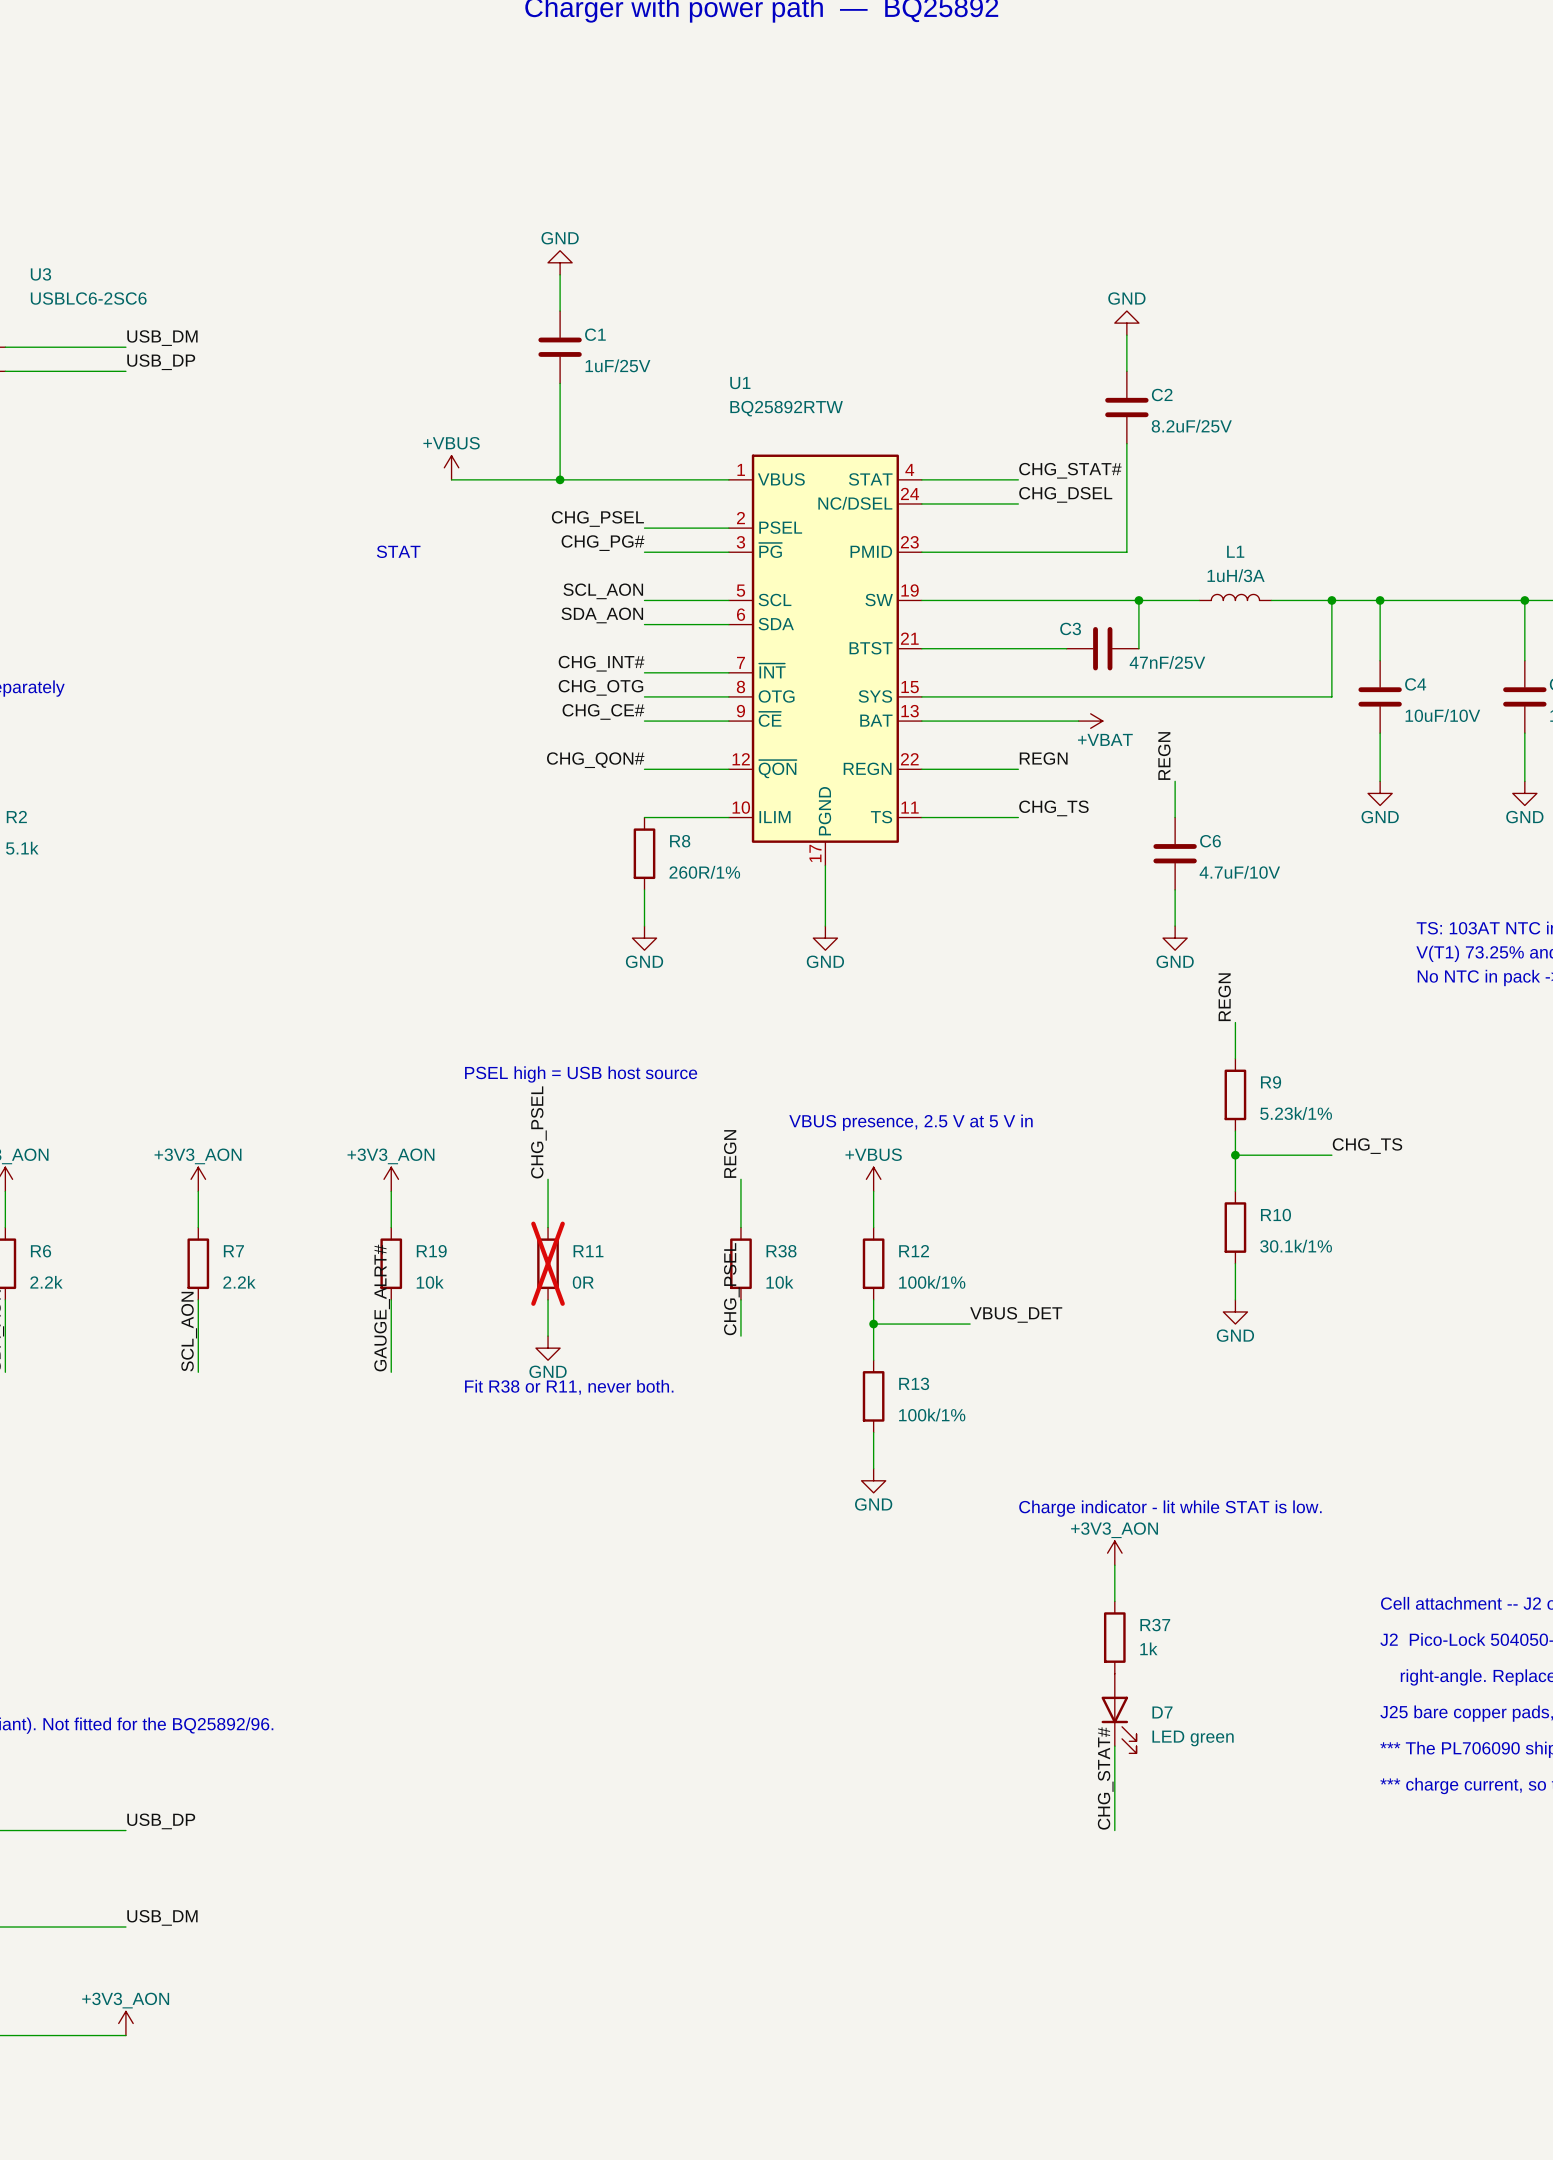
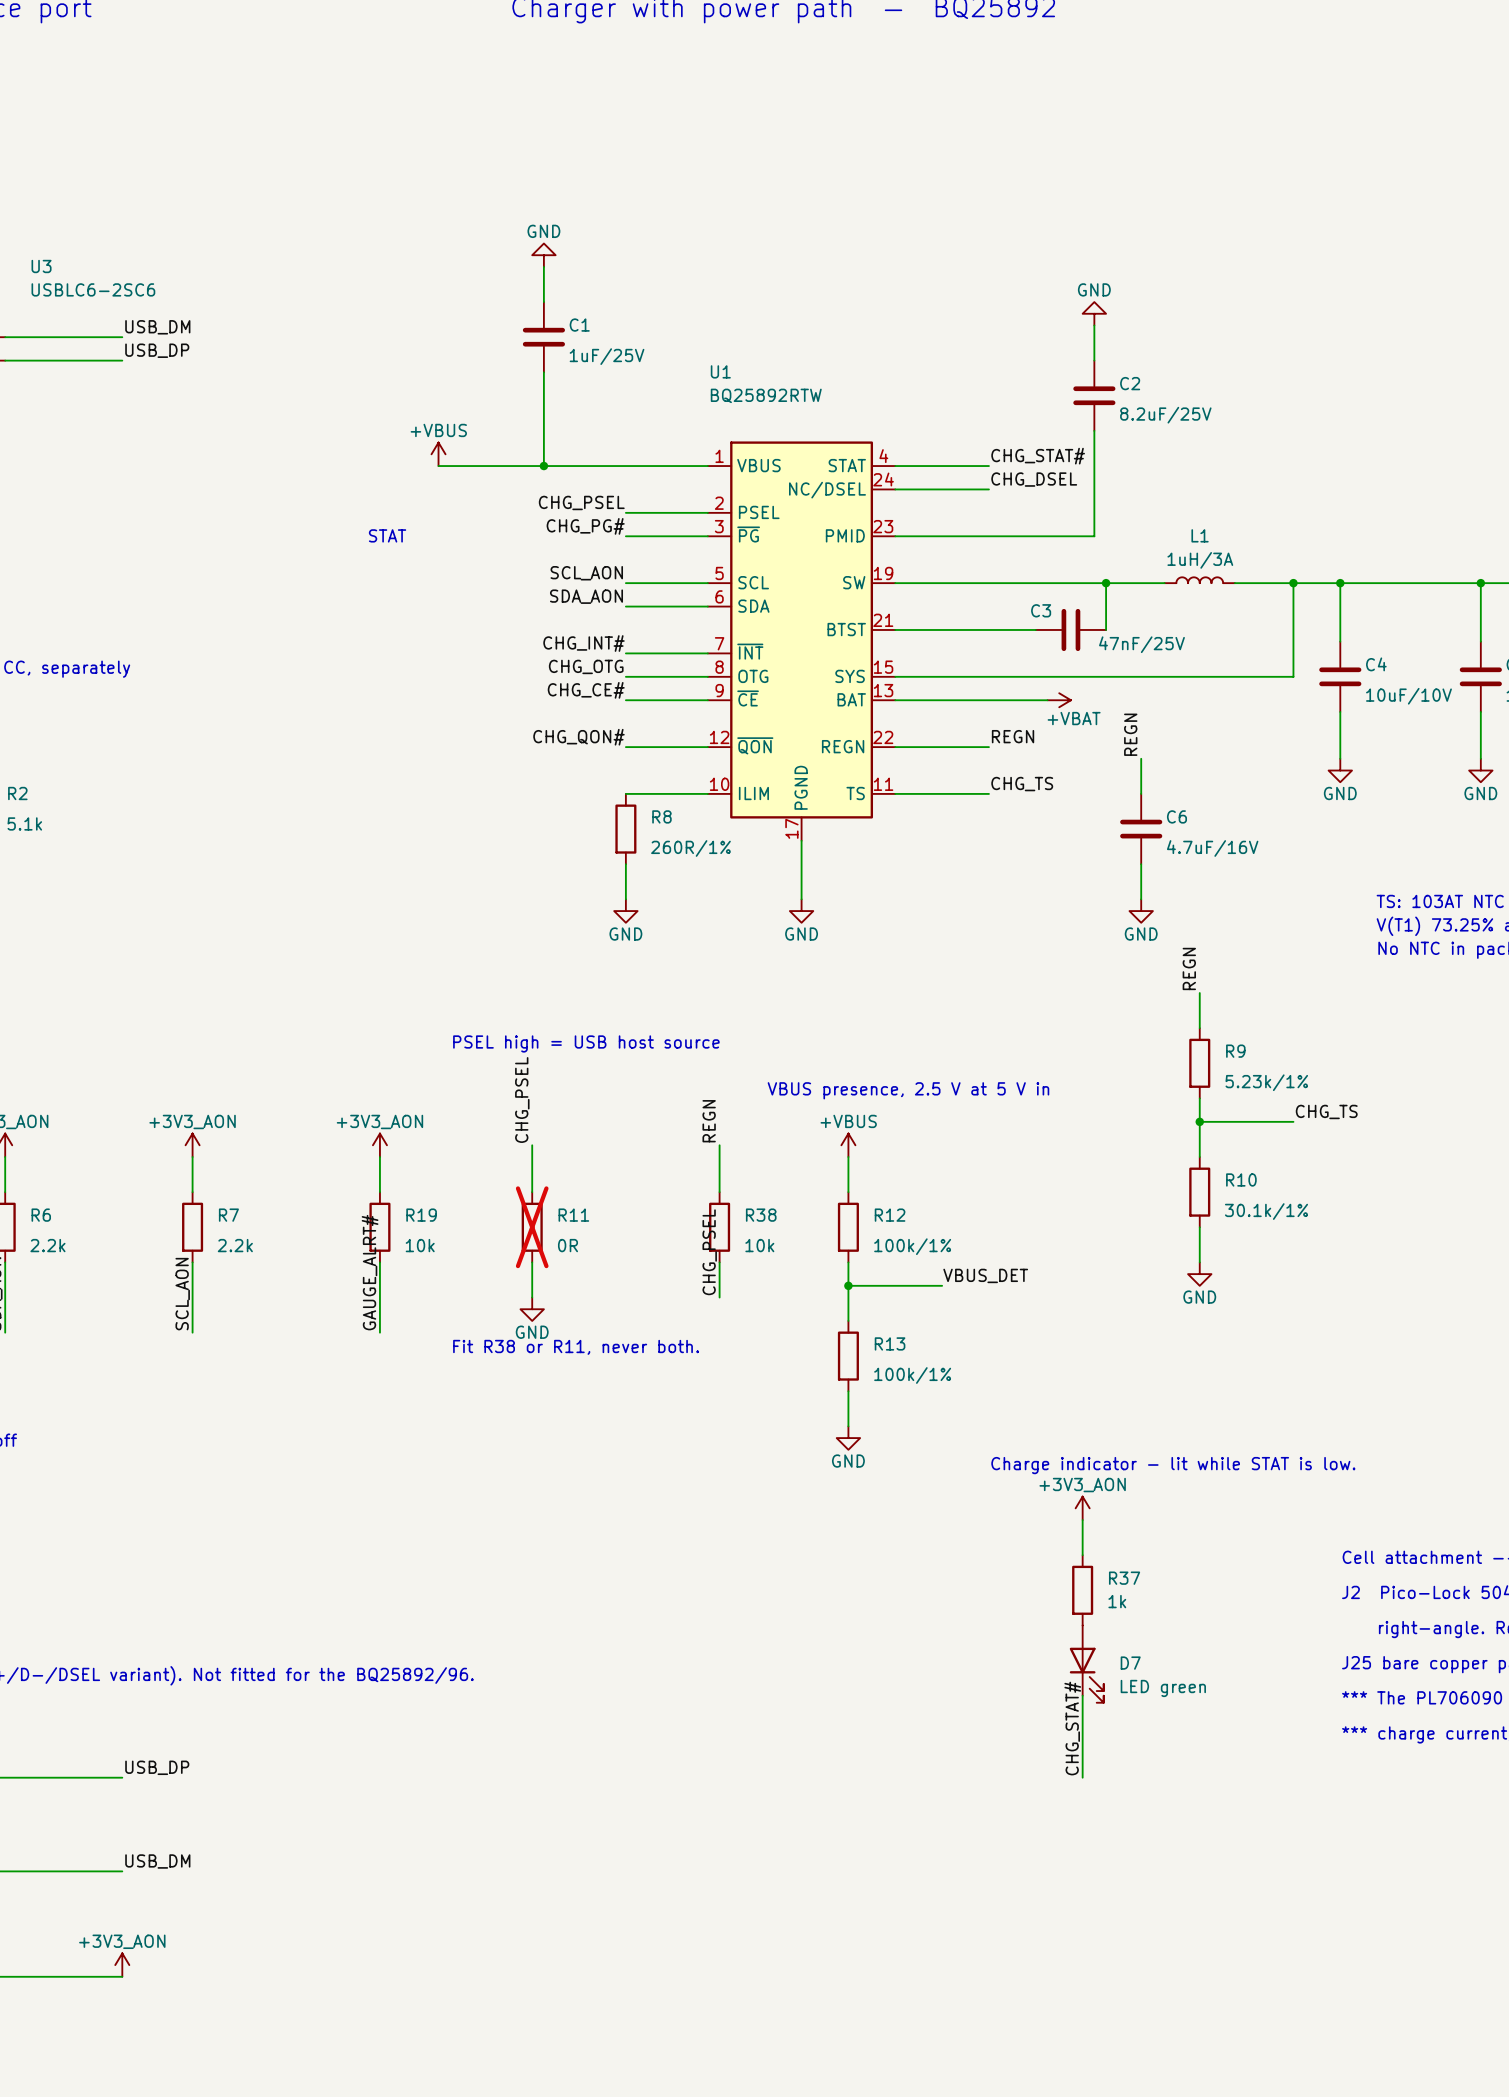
C6 value: 4.7uF/10V (1239, 872) -> 4.7uF/16V (1212, 848)

